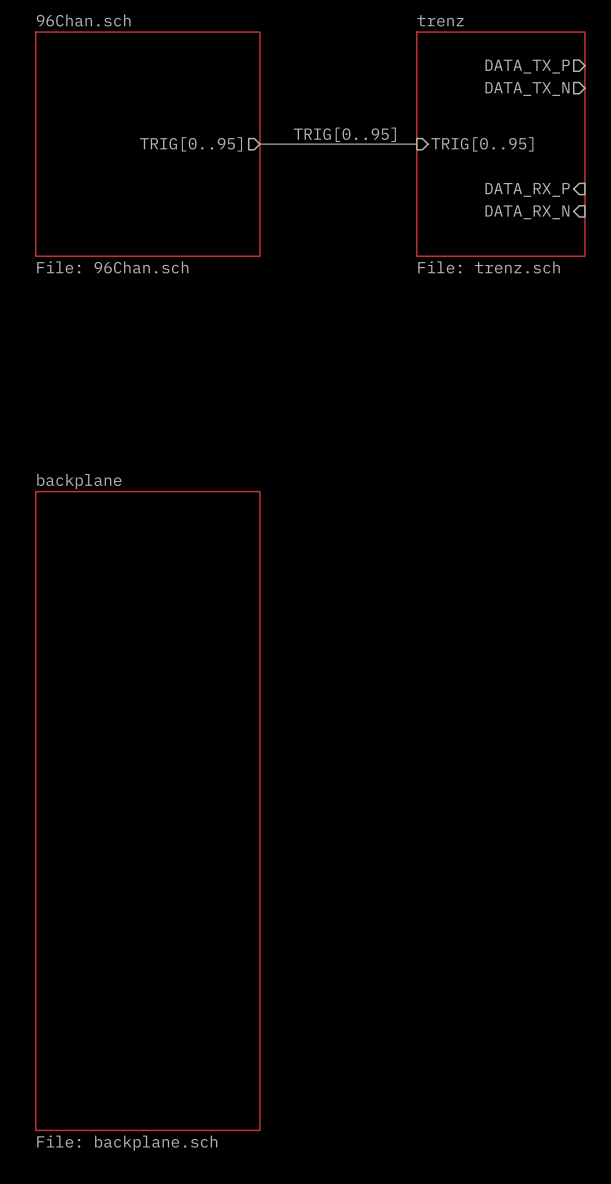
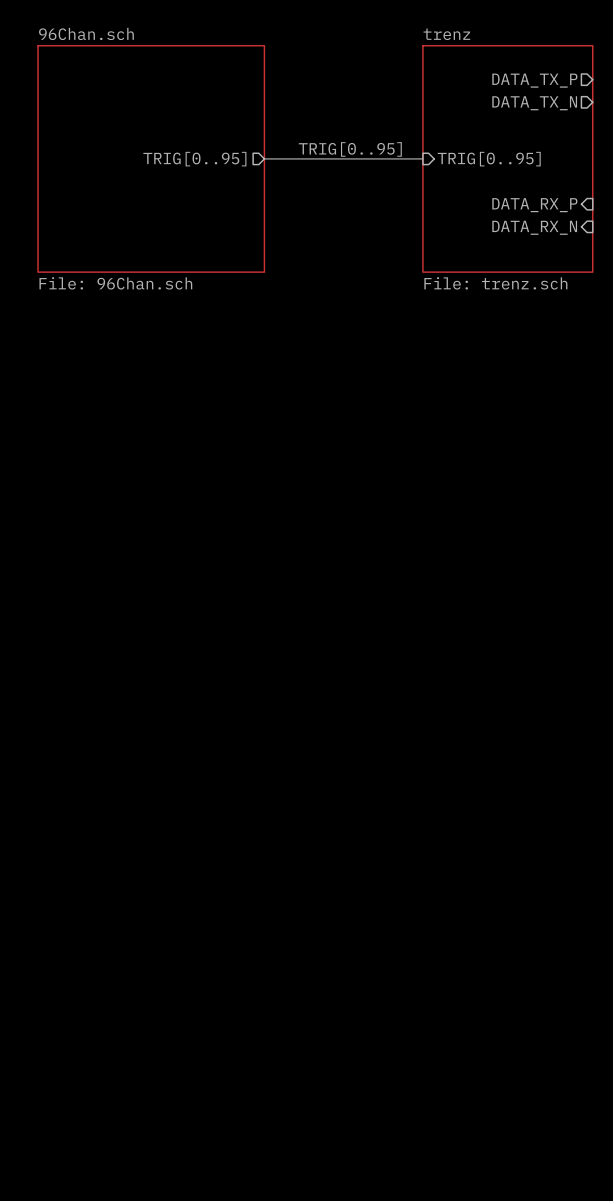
sheet backplane: File: backplane.sch (147, 811) -> none

